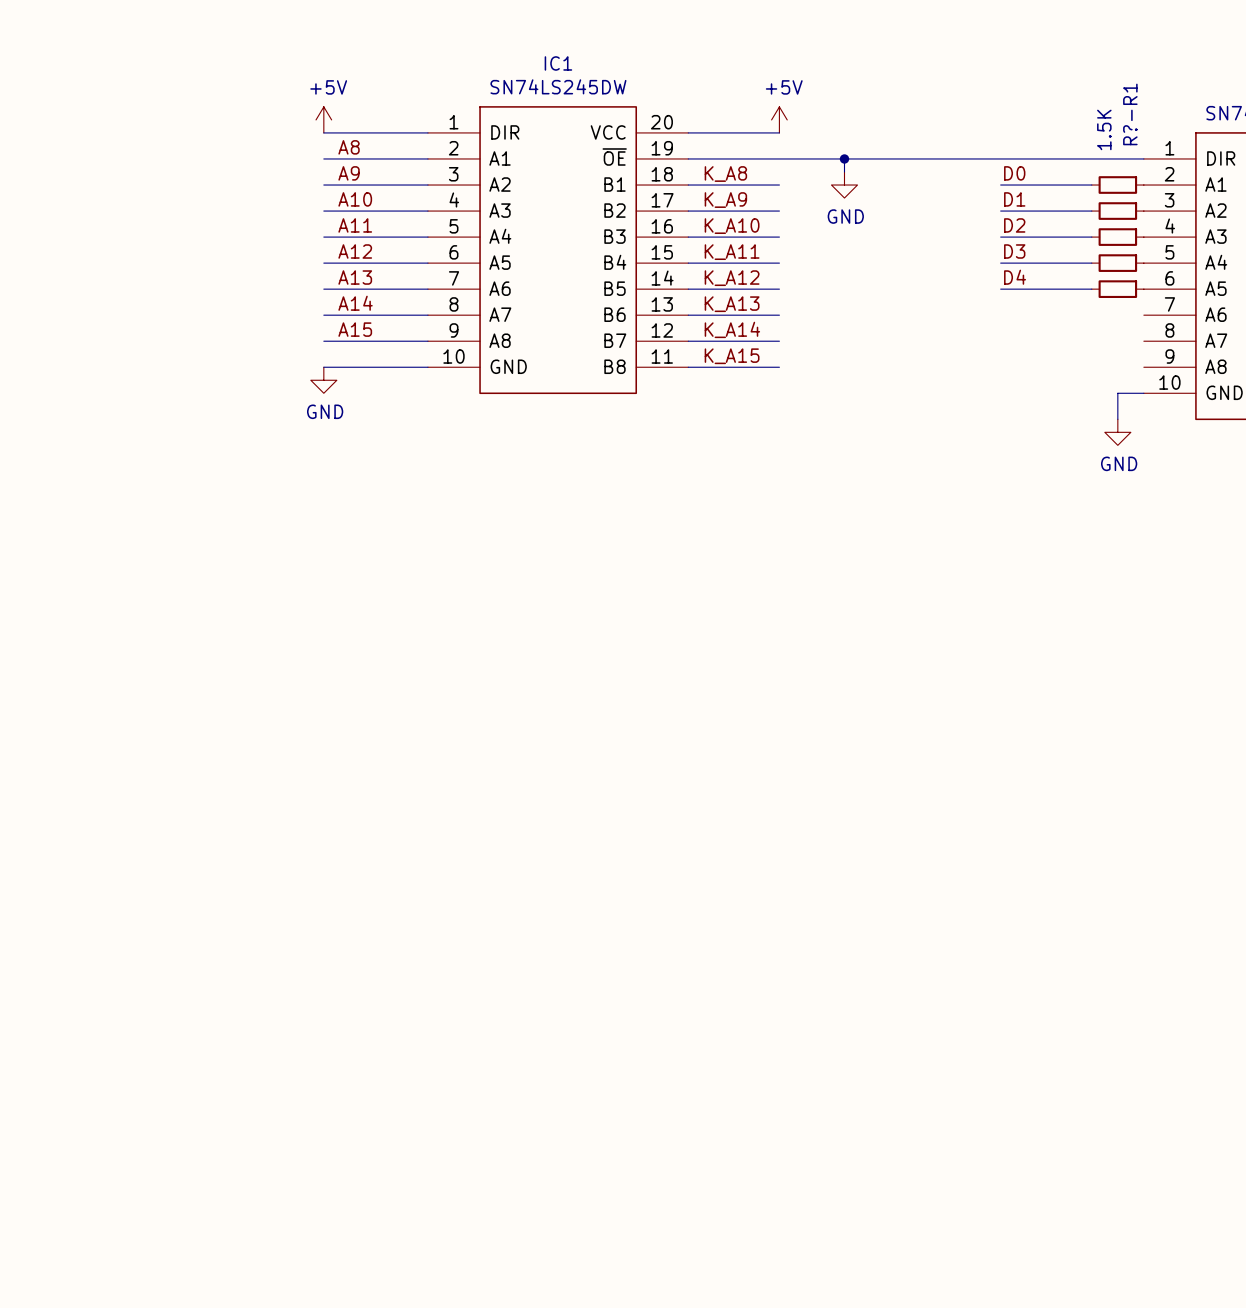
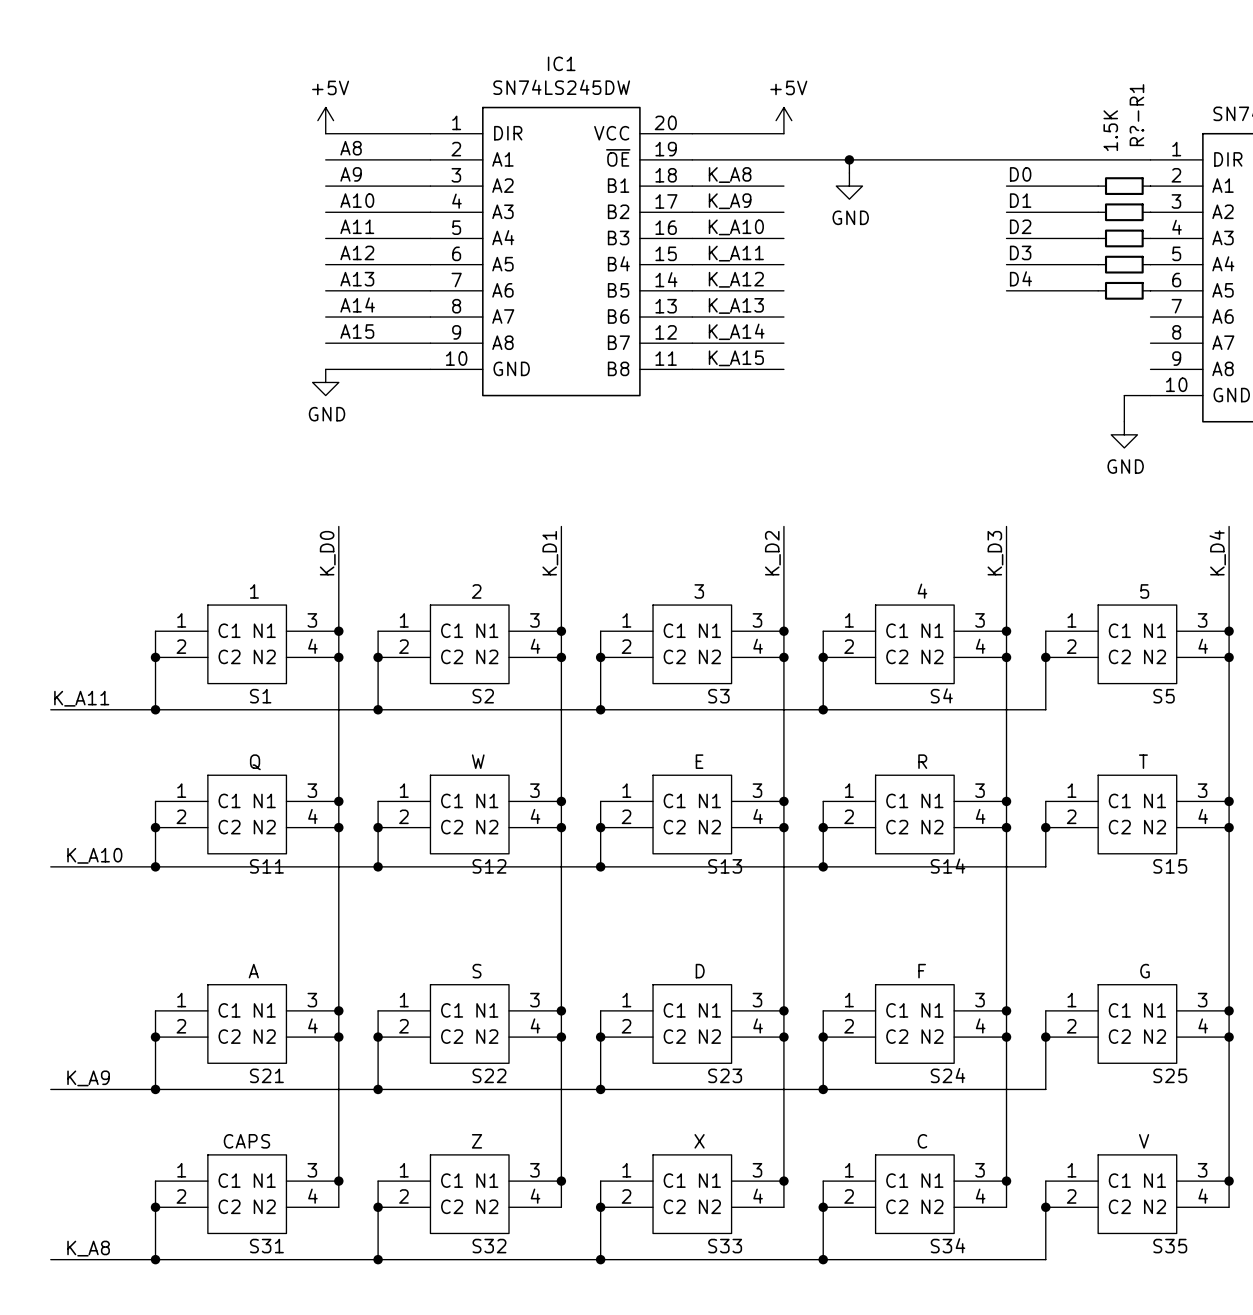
wire: none -> (338, 526) (338, 1207)
wire: none -> (561, 526) (561, 1207)
wire: none -> (783, 526) (783, 1207)
wire: none -> (1006, 526) (1006, 1207)
wire: none -> (1229, 526) (1229, 1207)
label: none -> K_D0 (327, 553)
label: none -> K_D1 (550, 553)
label: none -> K_D2 (772, 553)
label: none -> K_D3 (995, 553)
label: none -> K_D4 (1217, 552)
wire: none -> (155, 631) (155, 709)
junction: none -> (338, 631)
wire: none -> (378, 631) (378, 709)
junction: none -> (561, 631)
wire: none -> (600, 631) (600, 709)
junction: none -> (783, 631)
wire: none -> (823, 631) (823, 709)
junction: none -> (1006, 631)
wire: none -> (1045, 631) (1045, 709) (50, 709)
junction: none -> (1229, 631)
S1: none -> 1 (247, 644)
S2: none -> 2 (469, 644)
S3: none -> 3 (692, 644)
S4: none -> 4 (914, 644)
S5: none -> 5 (1137, 644)
junction: none -> (155, 657)
junction: none -> (338, 657)
junction: none -> (378, 657)
junction: none -> (561, 657)
junction: none -> (600, 657)
junction: none -> (783, 657)
junction: none -> (823, 657)
junction: none -> (1006, 657)
junction: none -> (1045, 657)
junction: none -> (1229, 657)
label: none -> K_A11 (81, 698)
junction: none -> (155, 709)
junction: none -> (378, 709)
junction: none -> (600, 709)
junction: none -> (823, 709)
wire: none -> (155, 801) (155, 866)
junction: none -> (338, 801)
wire: none -> (378, 801) (378, 866)
junction: none -> (561, 801)
wire: none -> (600, 801) (600, 866)
junction: none -> (783, 801)
wire: none -> (823, 801) (823, 866)
junction: none -> (1006, 801)
wire: none -> (1045, 801) (1045, 866) (50, 866)
junction: none -> (1229, 801)
S11: none -> Q (247, 814)
S12: none -> W (469, 814)
S13: none -> E (692, 814)
S14: none -> R (914, 814)
S15: none -> T (1137, 814)
junction: none -> (155, 827)
junction: none -> (338, 827)
junction: none -> (378, 827)
junction: none -> (561, 827)
junction: none -> (600, 827)
junction: none -> (783, 827)
junction: none -> (823, 827)
junction: none -> (1006, 827)
junction: none -> (1045, 827)
junction: none -> (1229, 827)
label: none -> K_A10 (94, 855)
junction: none -> (155, 866)
junction: none -> (378, 866)
junction: none -> (600, 866)
junction: none -> (823, 866)
wire: none -> (155, 1010) (155, 1089)
junction: none -> (338, 1010)
wire: none -> (378, 1010) (378, 1089)
junction: none -> (561, 1010)
wire: none -> (600, 1010) (600, 1089)
junction: none -> (783, 1010)
wire: none -> (823, 1010) (823, 1089)
junction: none -> (1006, 1010)
wire: none -> (1045, 1010) (1045, 1089) (50, 1089)
junction: none -> (1229, 1010)
S21: none -> A (247, 1023)
S22: none -> S (469, 1023)
S23: none -> D (692, 1023)
S24: none -> F (914, 1023)
S25: none -> G (1137, 1023)
junction: none -> (155, 1037)
junction: none -> (338, 1037)
junction: none -> (378, 1037)
junction: none -> (561, 1037)
junction: none -> (600, 1037)
junction: none -> (783, 1037)
junction: none -> (823, 1037)
junction: none -> (1006, 1037)
junction: none -> (1045, 1037)
junction: none -> (1229, 1037)
label: none -> K_A9 (88, 1078)
junction: none -> (155, 1089)
junction: none -> (378, 1089)
junction: none -> (600, 1089)
junction: none -> (823, 1089)
wire: none -> (155, 1181) (155, 1259)
junction: none -> (338, 1181)
wire: none -> (378, 1181) (378, 1259)
junction: none -> (561, 1181)
wire: none -> (600, 1181) (600, 1259)
junction: none -> (783, 1181)
wire: none -> (823, 1181) (823, 1259)
junction: none -> (1006, 1181)
wire: none -> (1045, 1181) (1045, 1259) (50, 1259)
junction: none -> (1229, 1181)
S31: none -> CAPS (247, 1194)
S32: none -> Z (469, 1194)
S33: none -> X (692, 1194)
S34: none -> C (914, 1194)
S35: none -> V (1137, 1194)
junction: none -> (155, 1207)
junction: none -> (378, 1207)
junction: none -> (600, 1207)
junction: none -> (823, 1207)
junction: none -> (1045, 1207)
label: none -> K_A8 (88, 1248)
junction: none -> (155, 1259)
junction: none -> (378, 1259)
junction: none -> (600, 1259)
junction: none -> (823, 1259)

